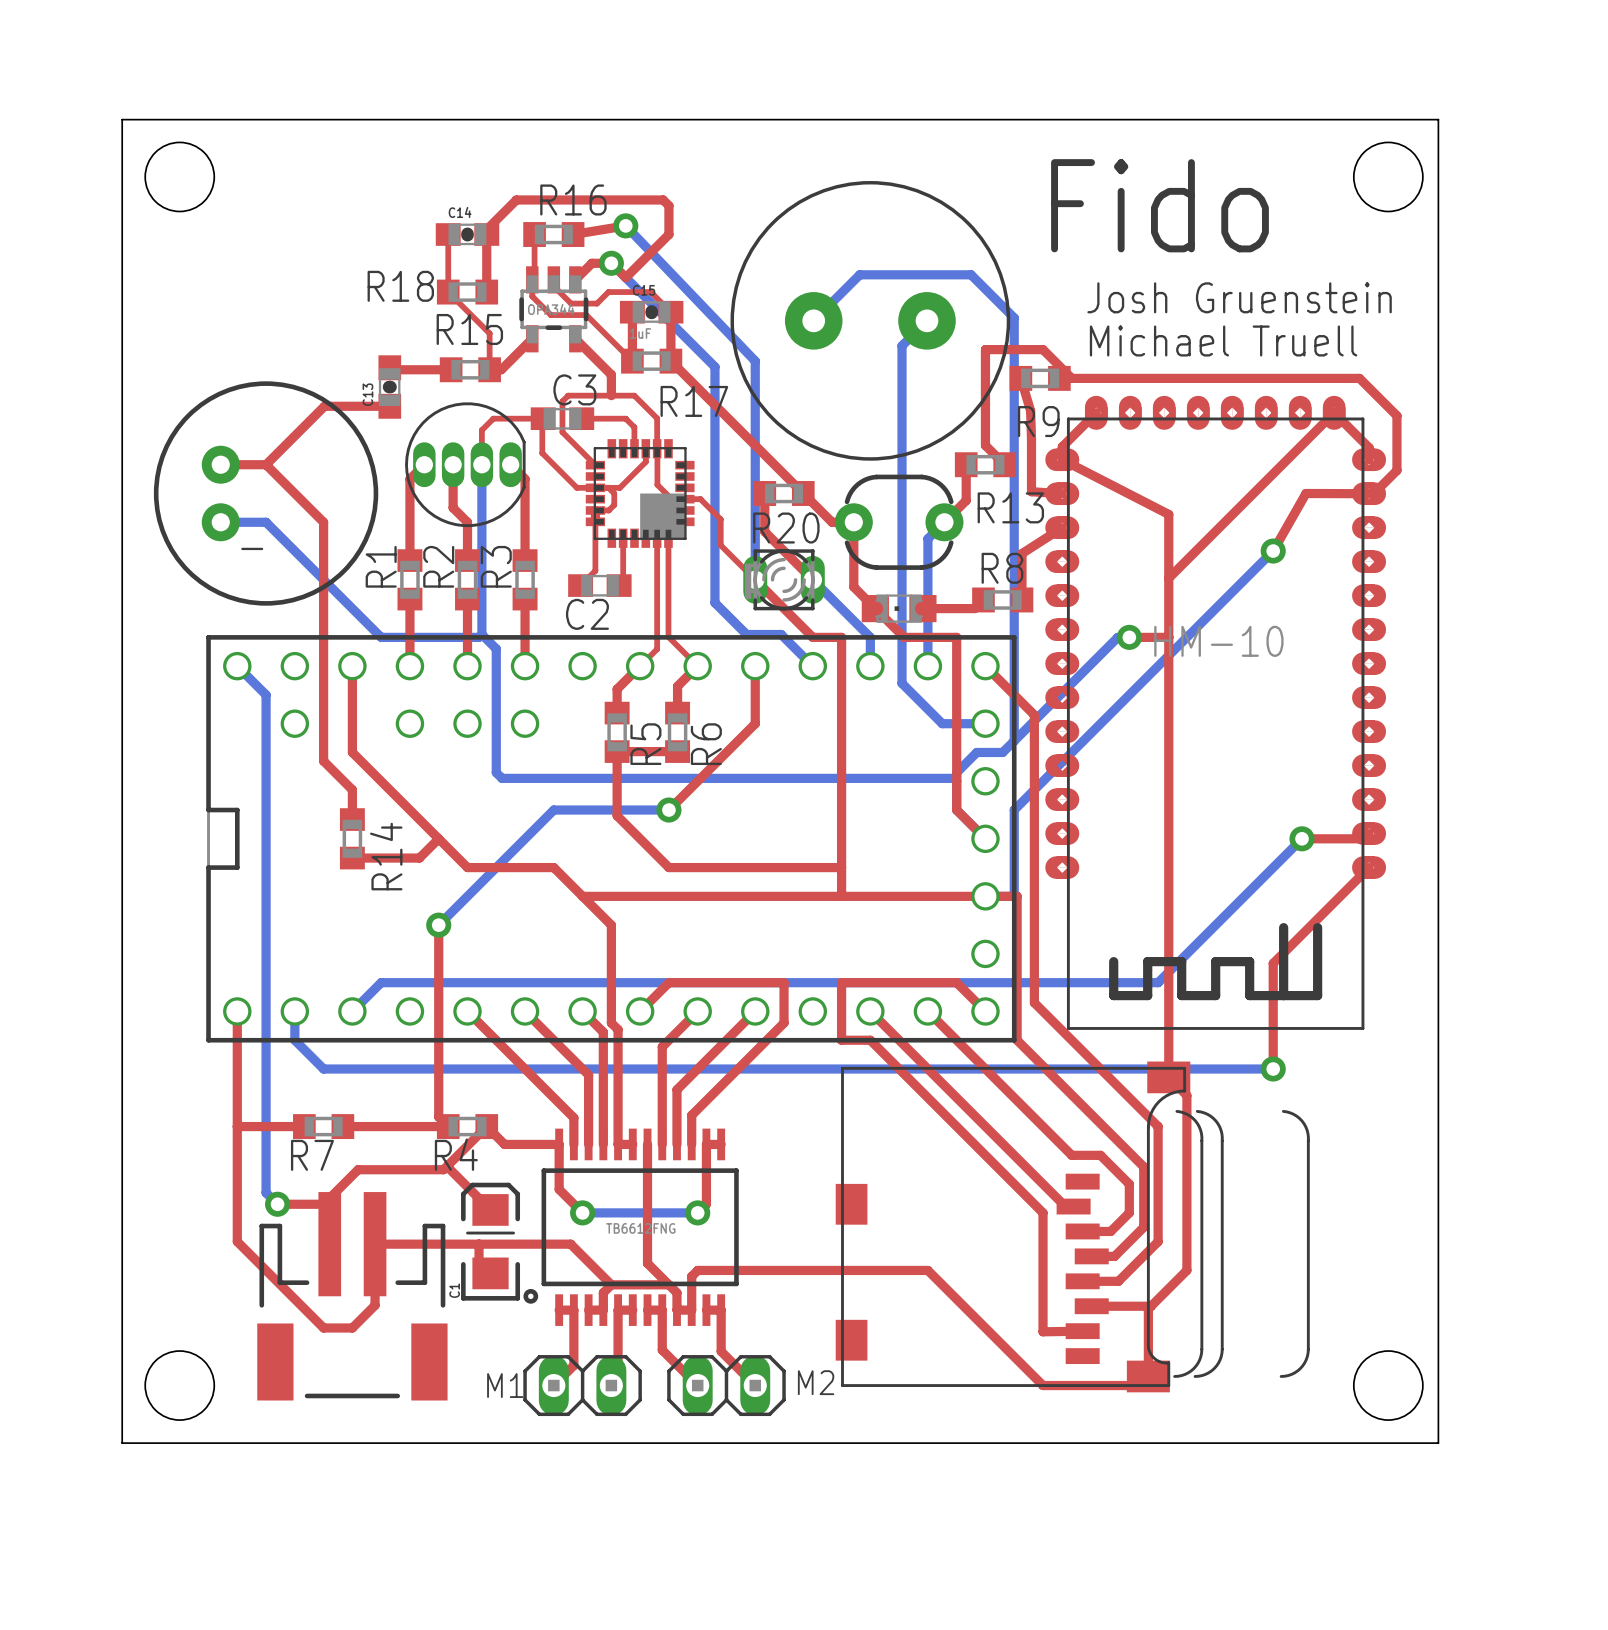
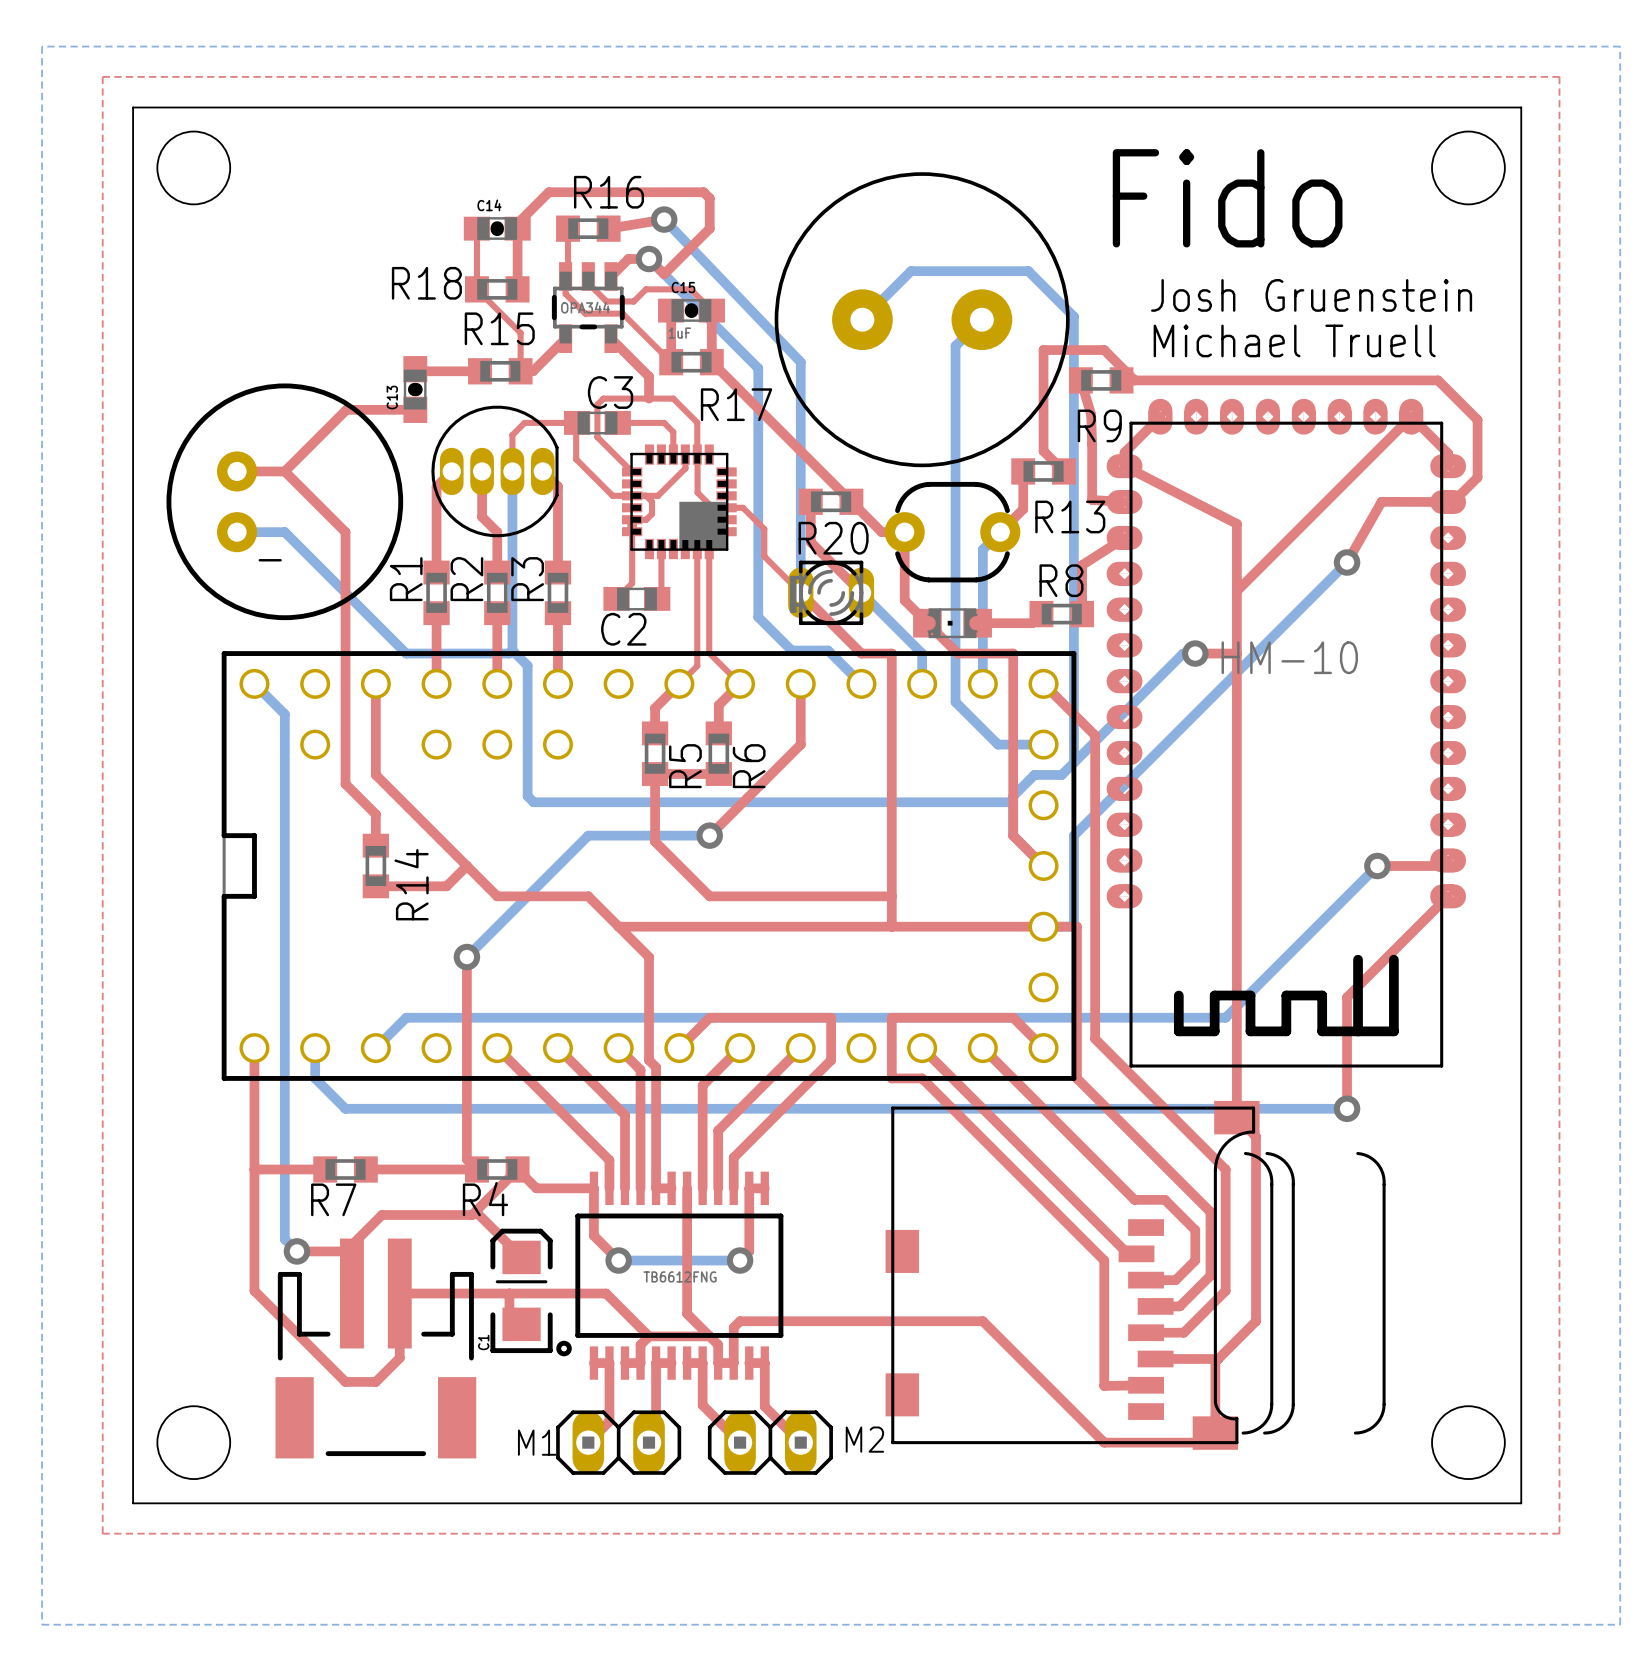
bottom zone outline: none -> (42, 46) (1620, 46) (1620, 1624) (42, 1624) (42, 46)
top zone outline: none -> (102, 76) (1559, 76) (1559, 1533) (102, 1533) (102, 76)

